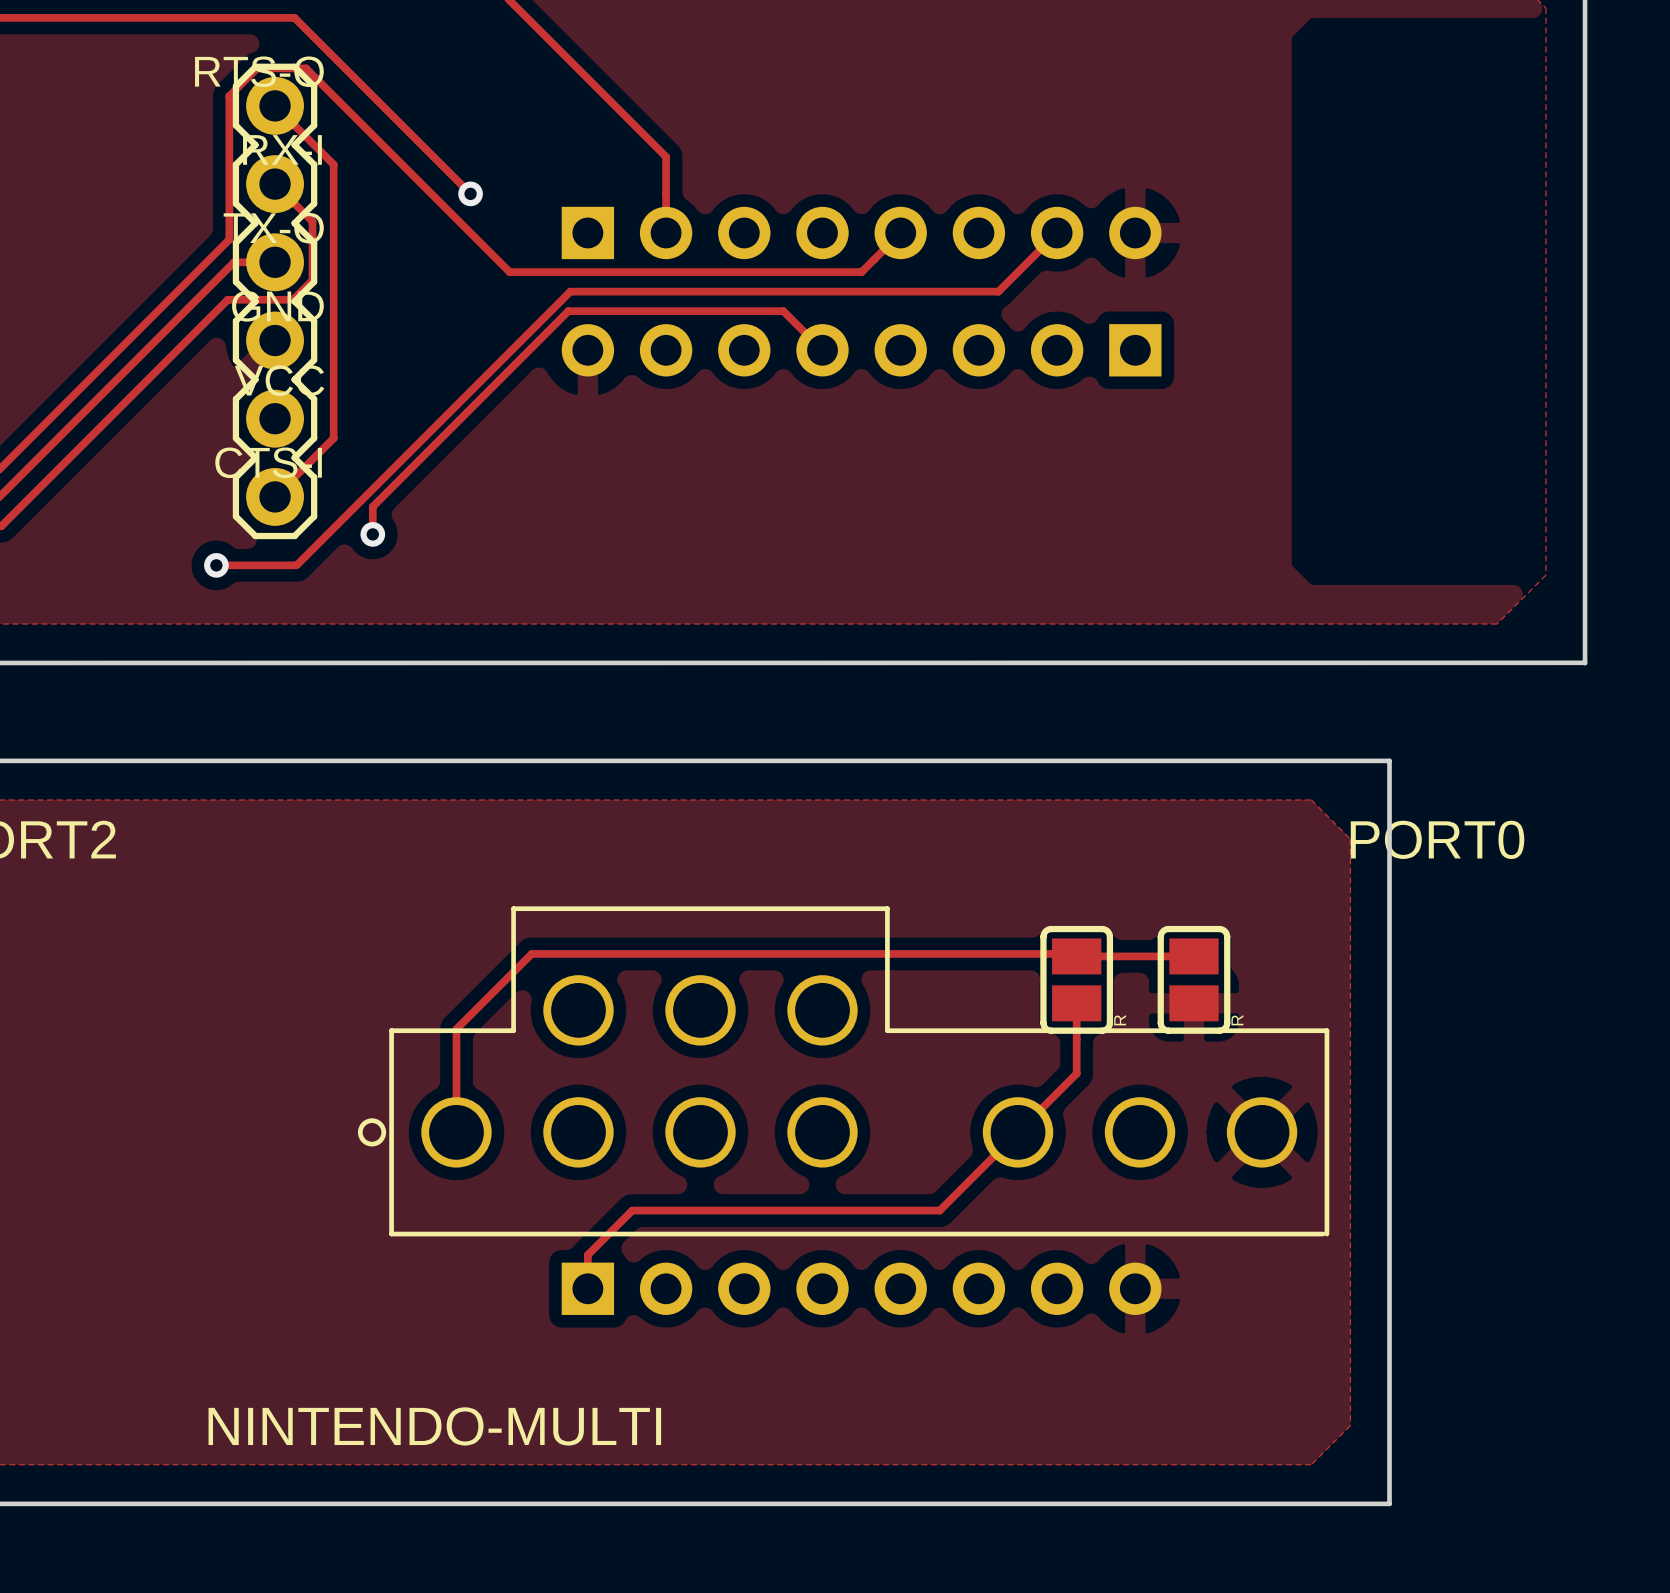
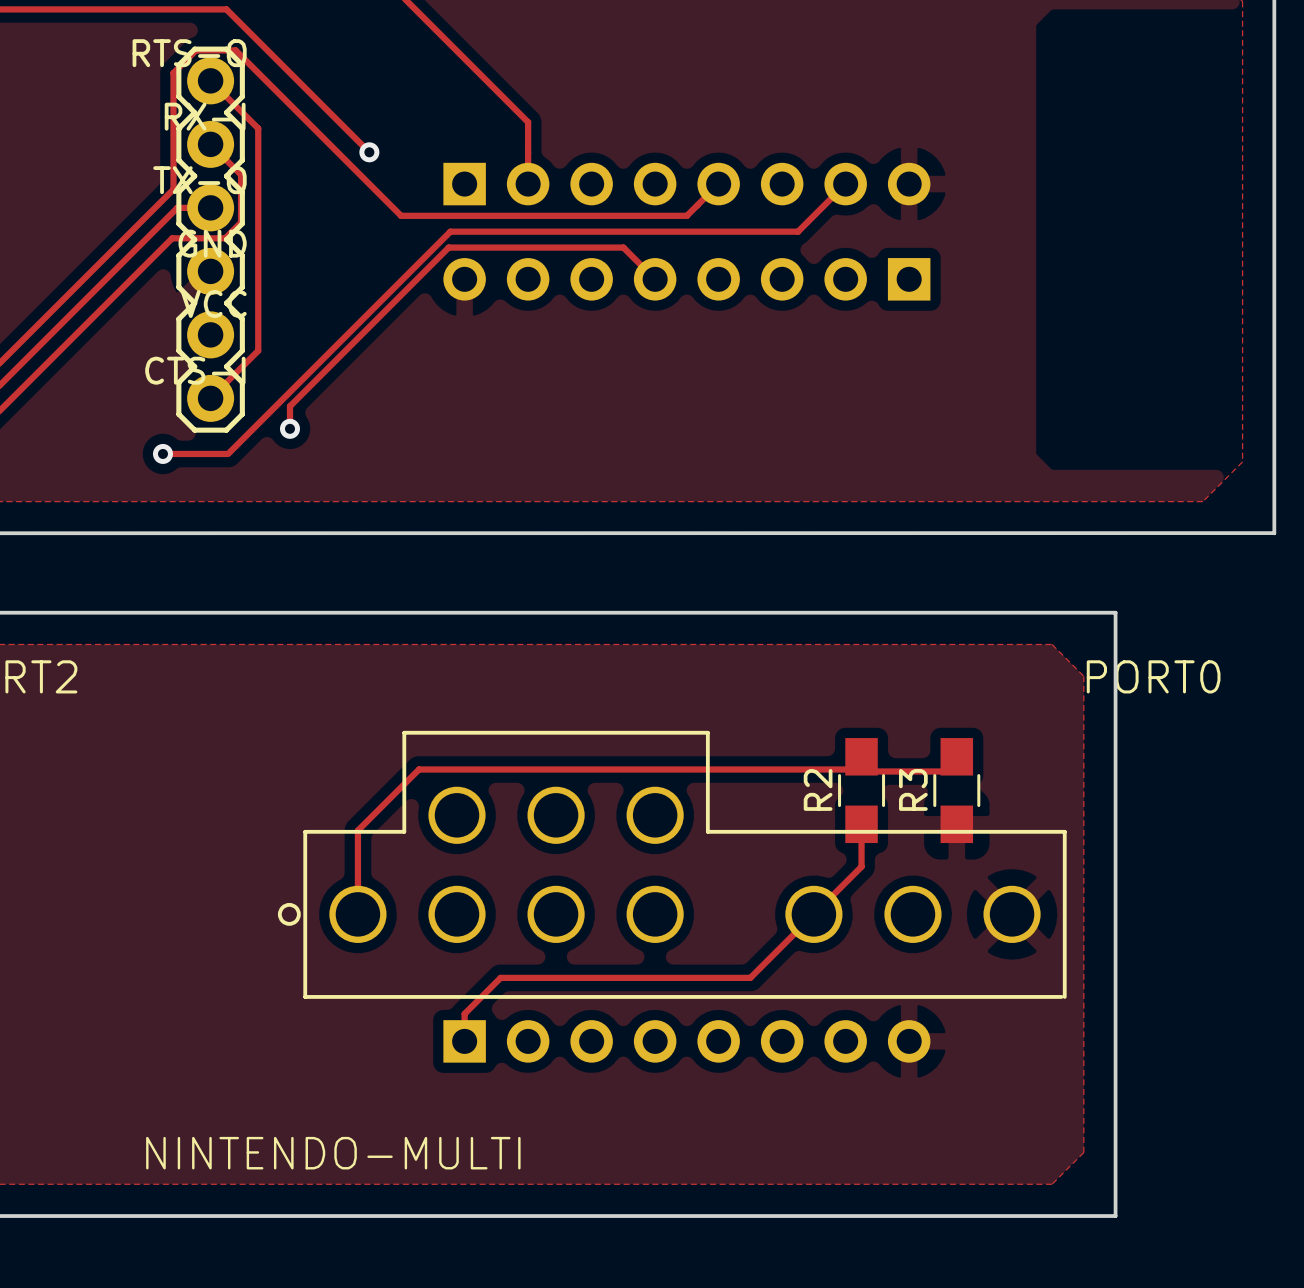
part: R (1076, 979) -> none
R2: none -> (861, 790)
part: R (1193, 979) -> none
R3: none -> (956, 790)

